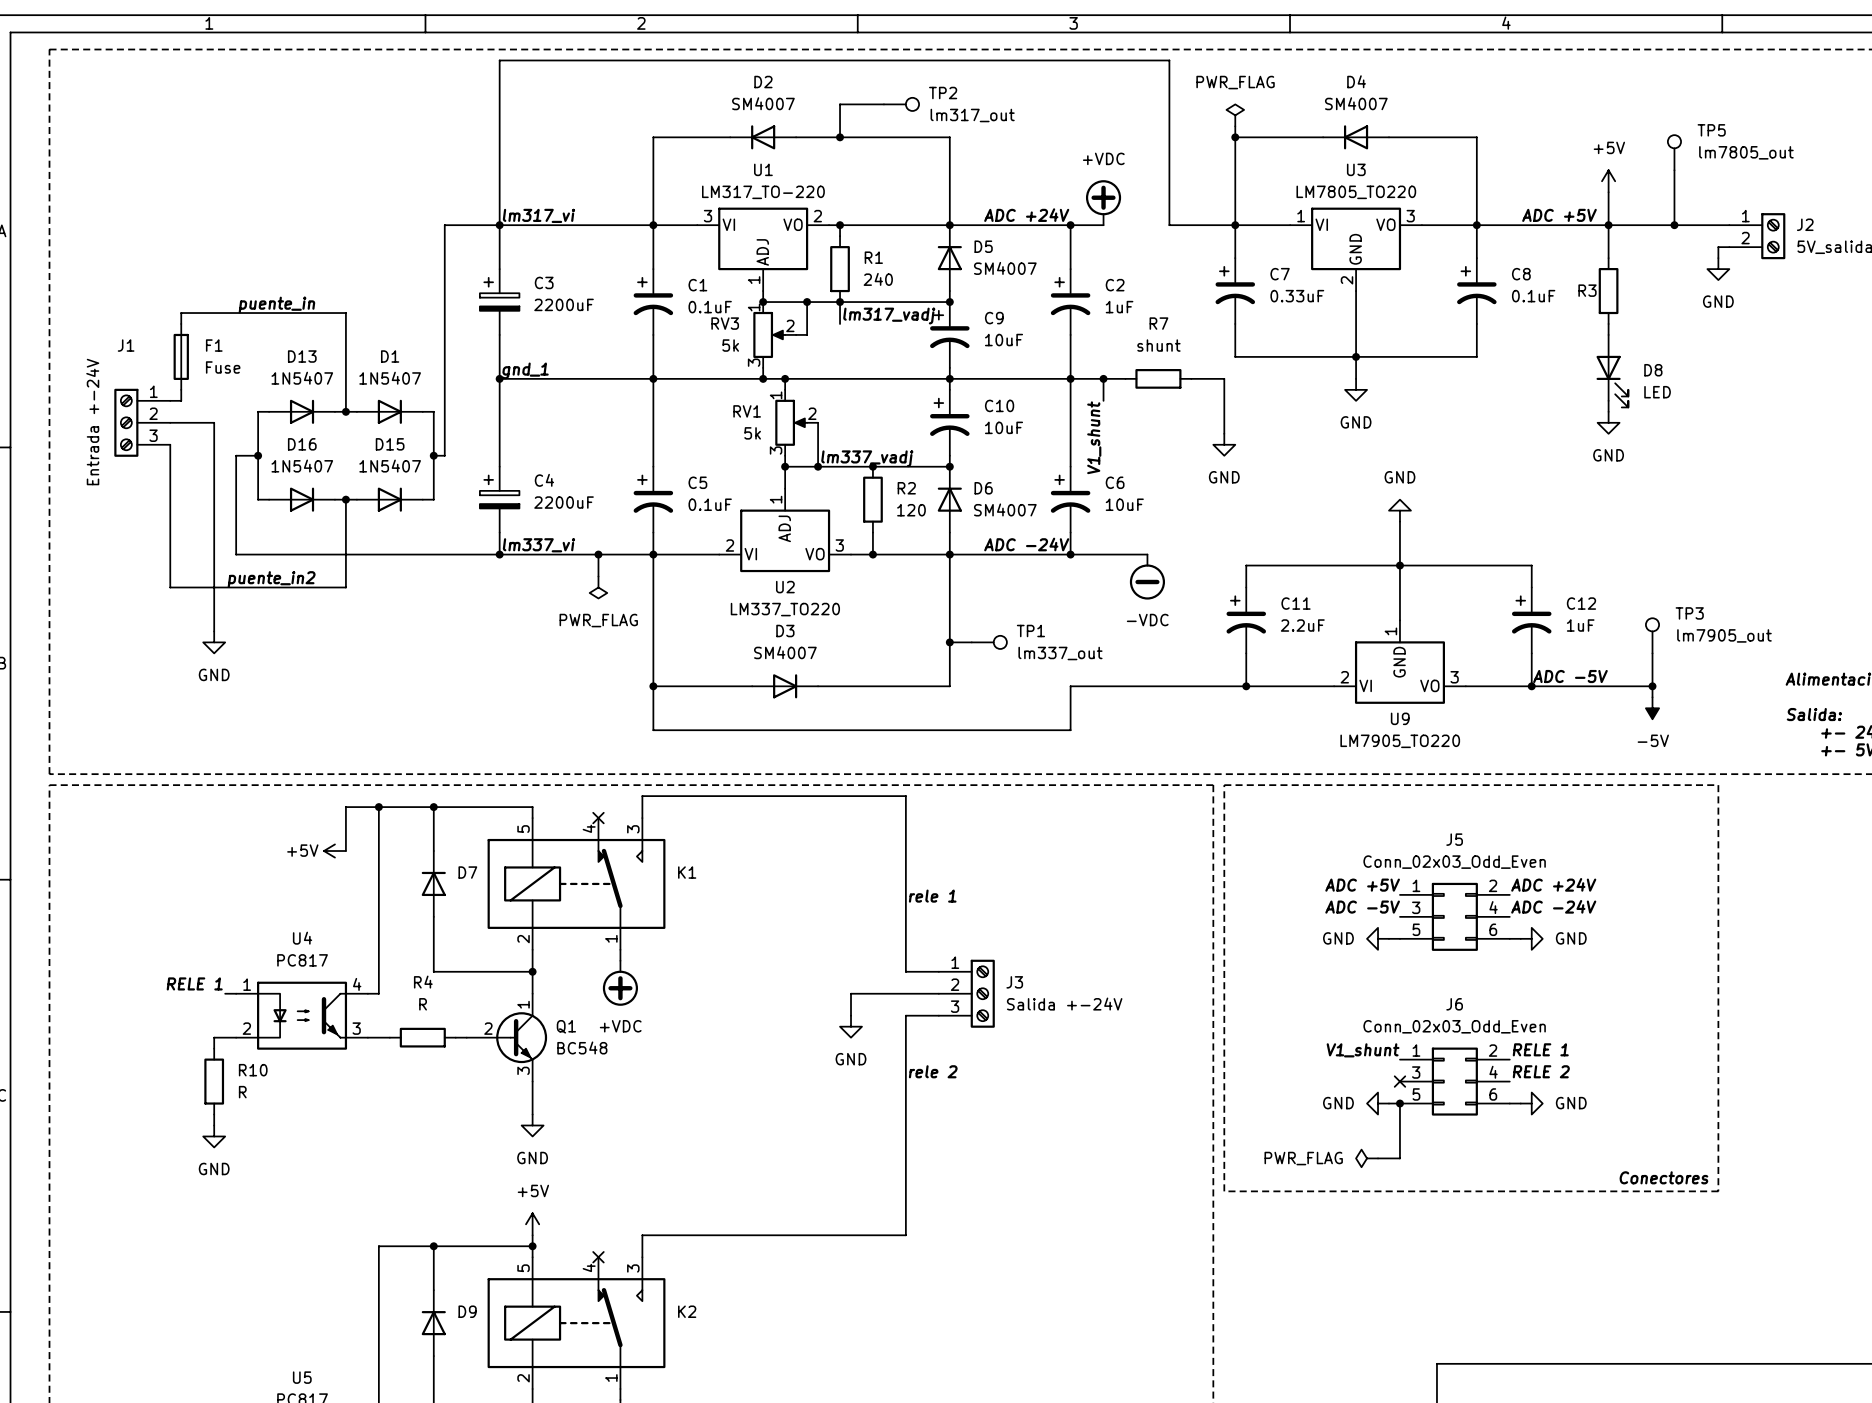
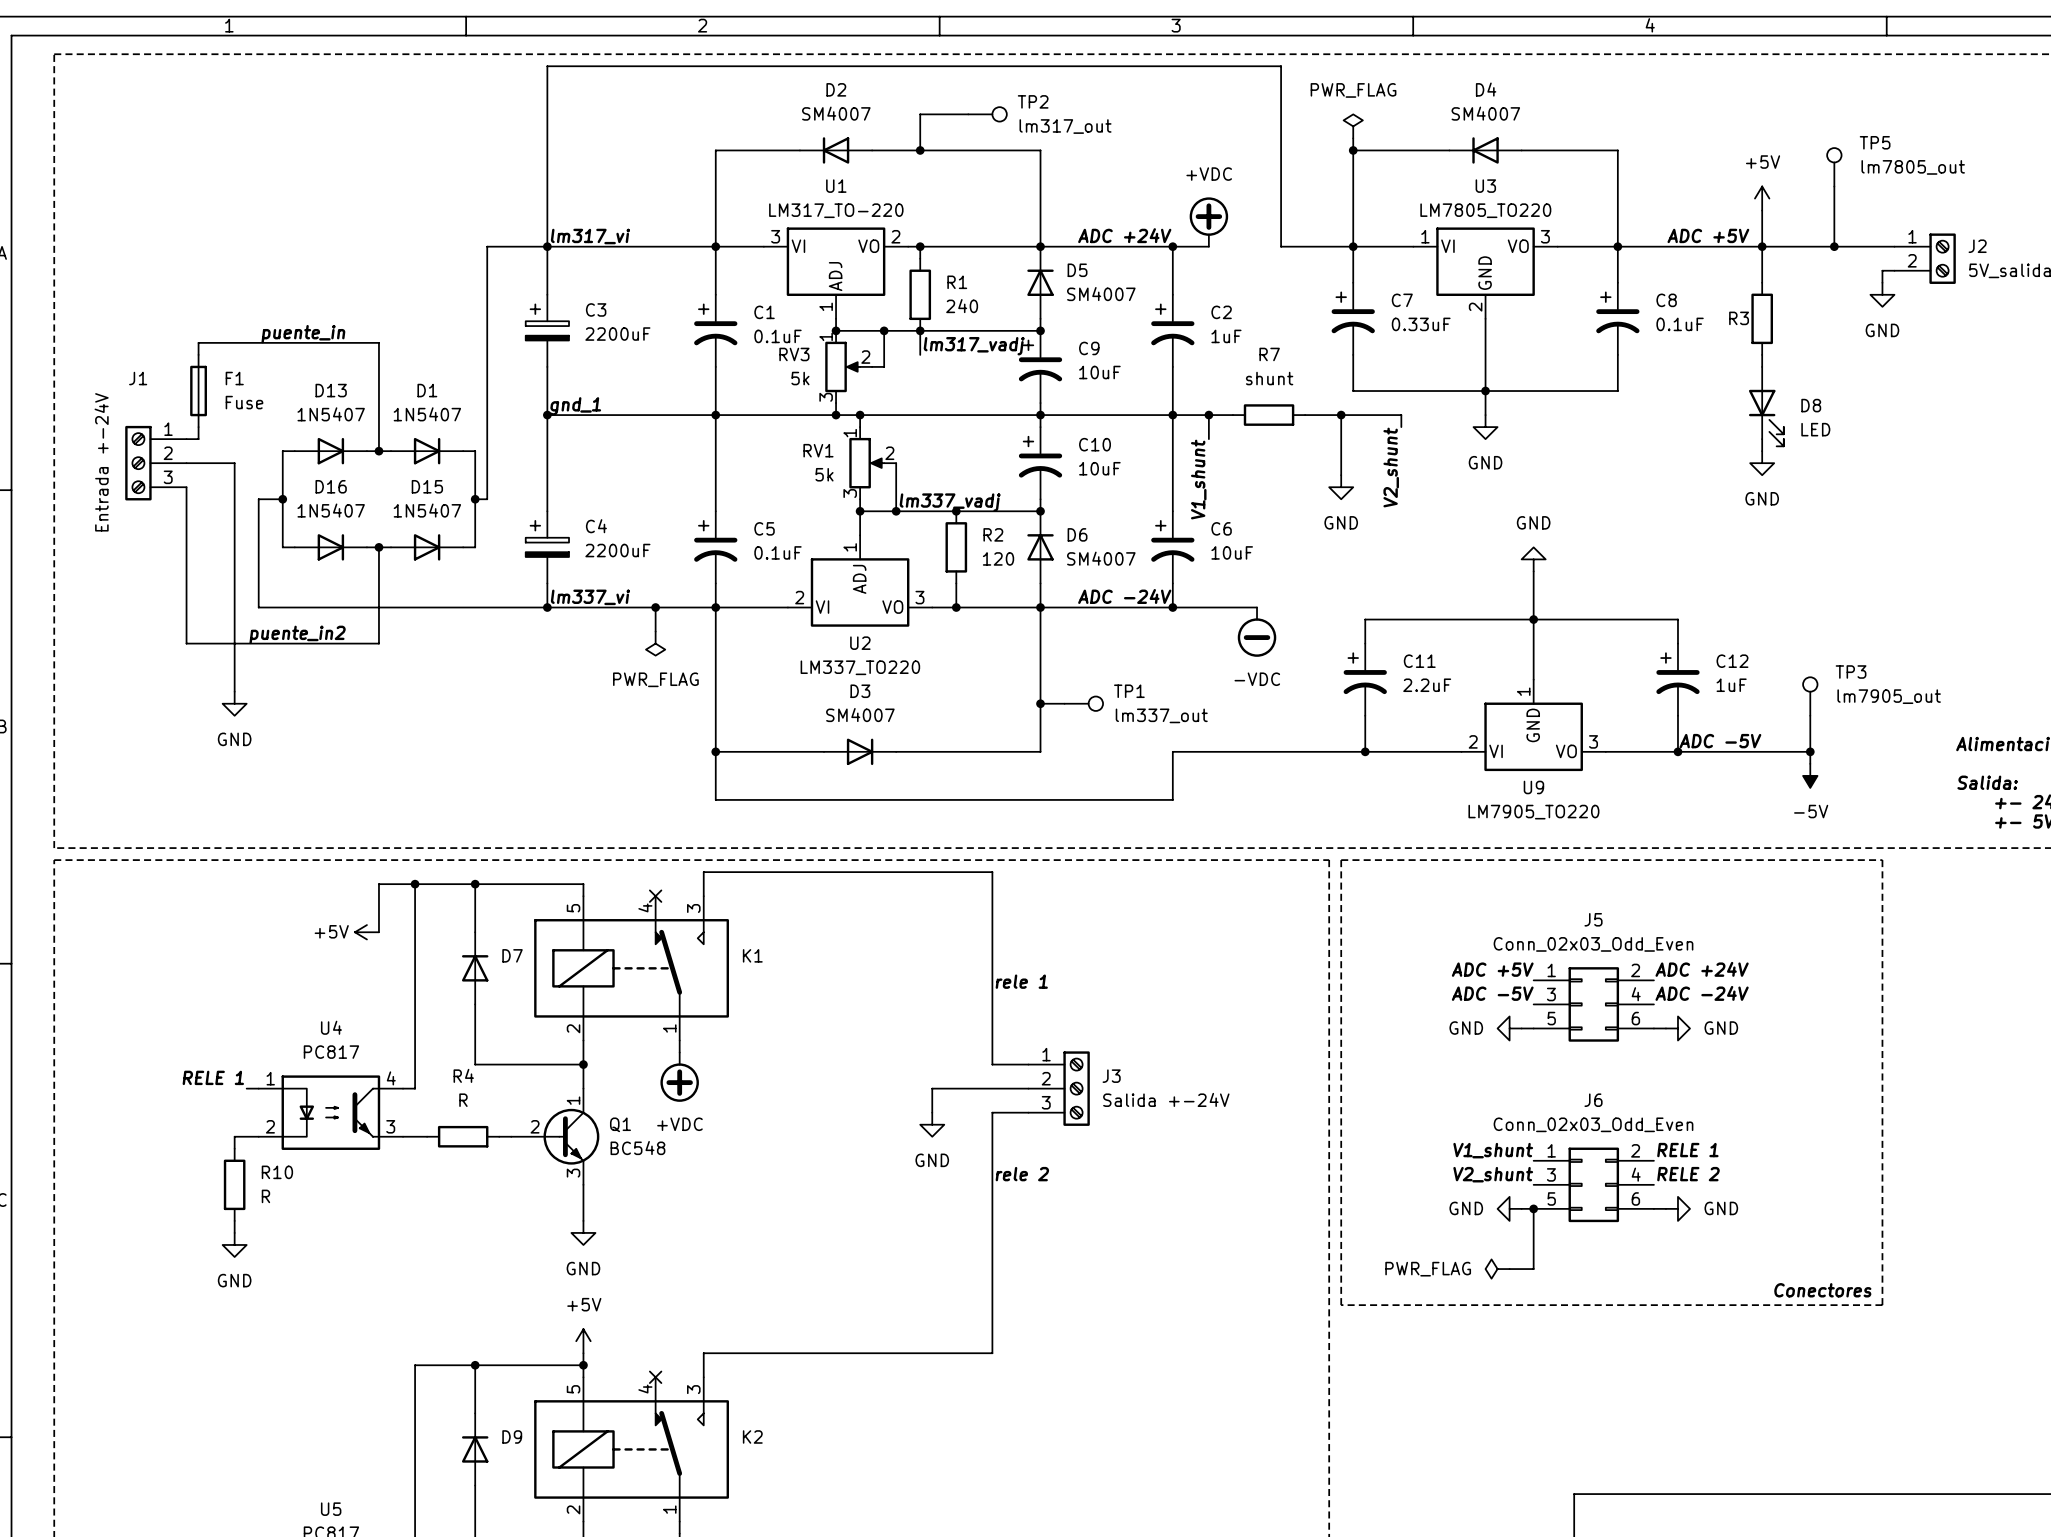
wire: none -> (1341, 415) (1401, 415) (1401, 427)
junction: none -> (1341, 415)
label: none -> V2_shunt (1391, 467)
label: none -> V2_shunt (1493, 1174)
no-connect mark: (1399, 1081) -> none

